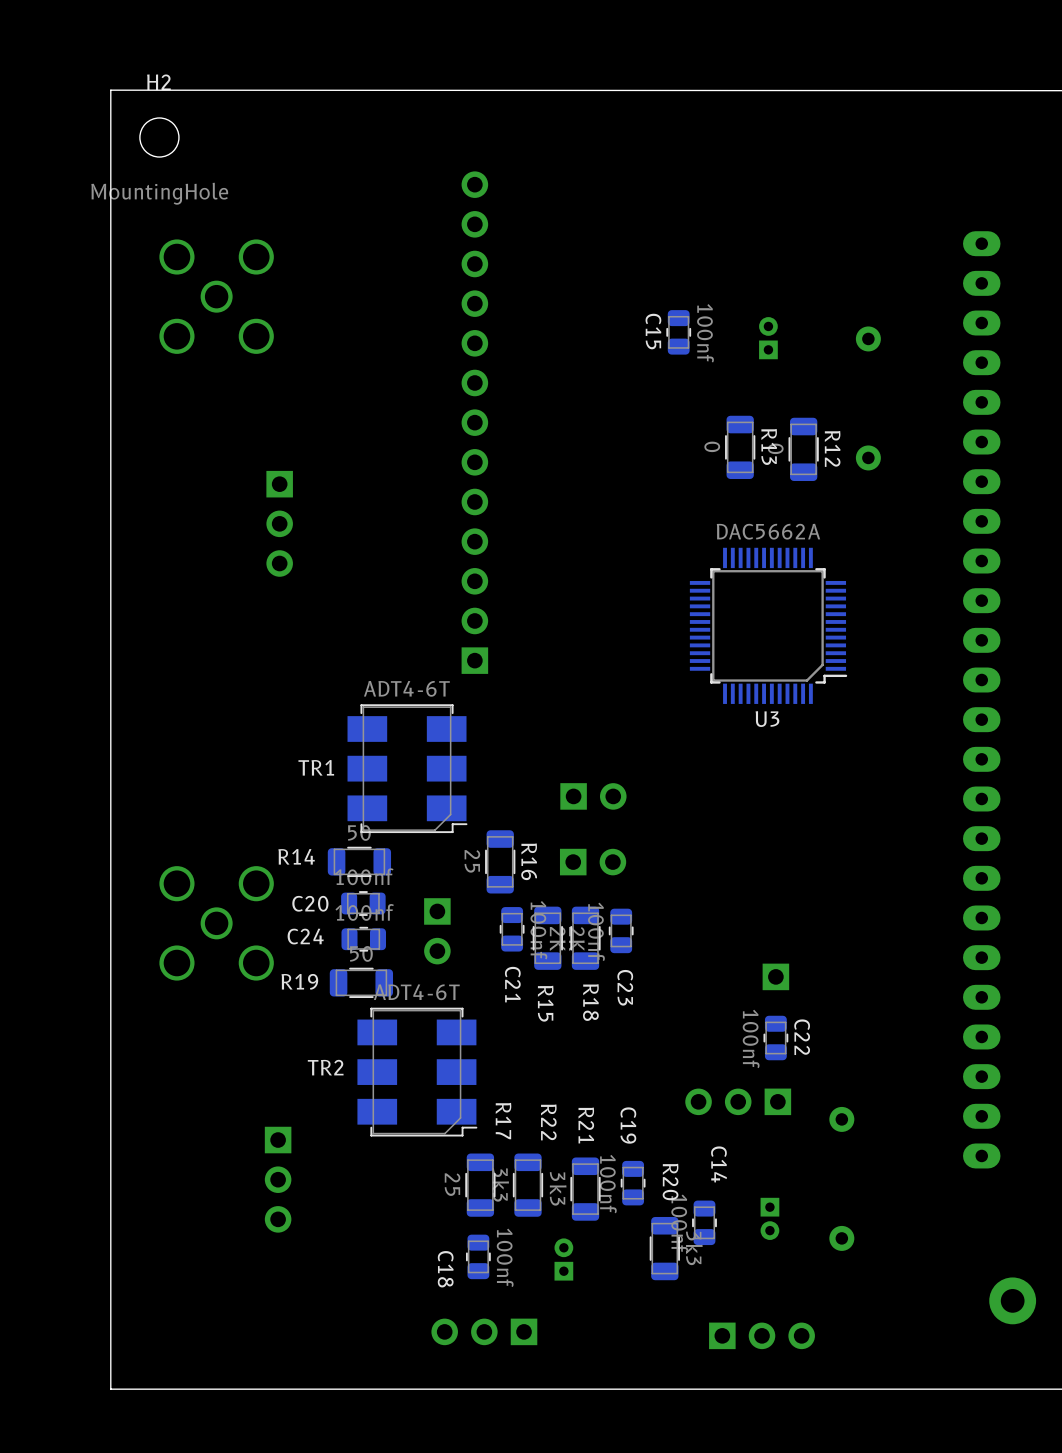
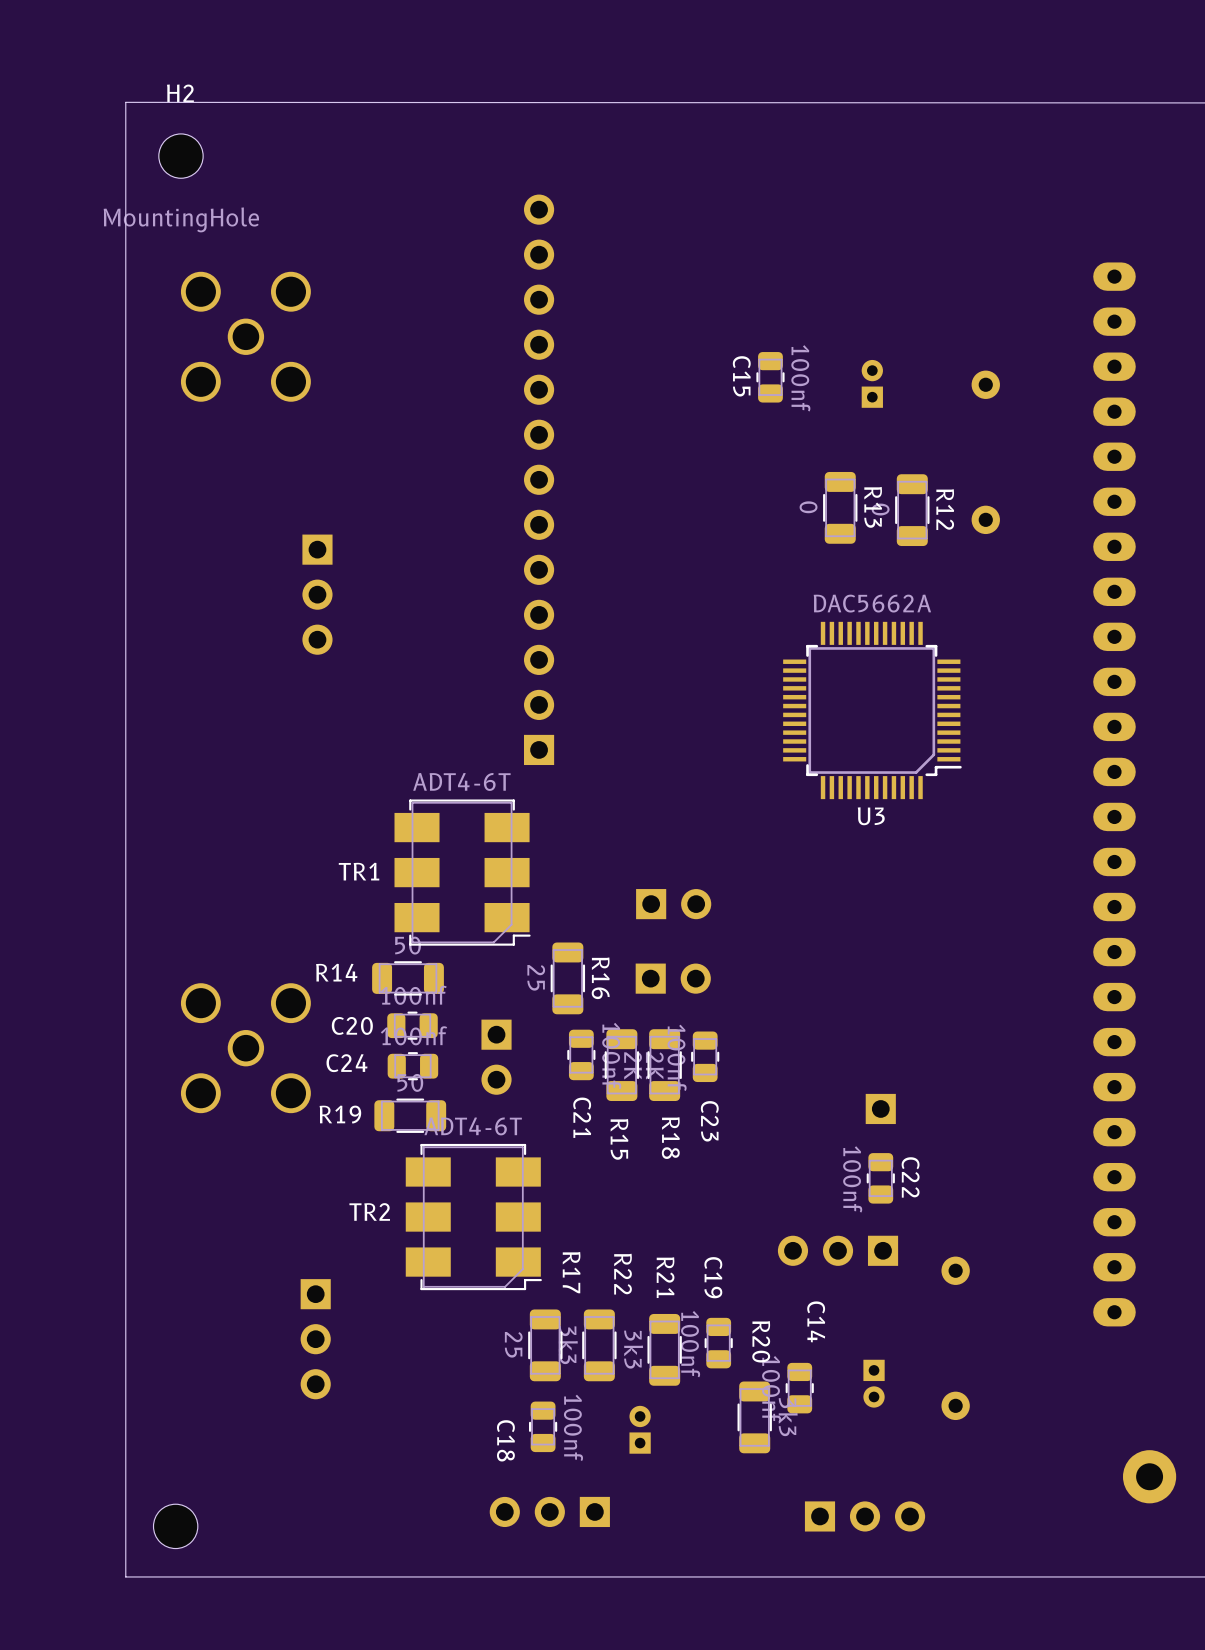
part: none -> (175, 1526)

